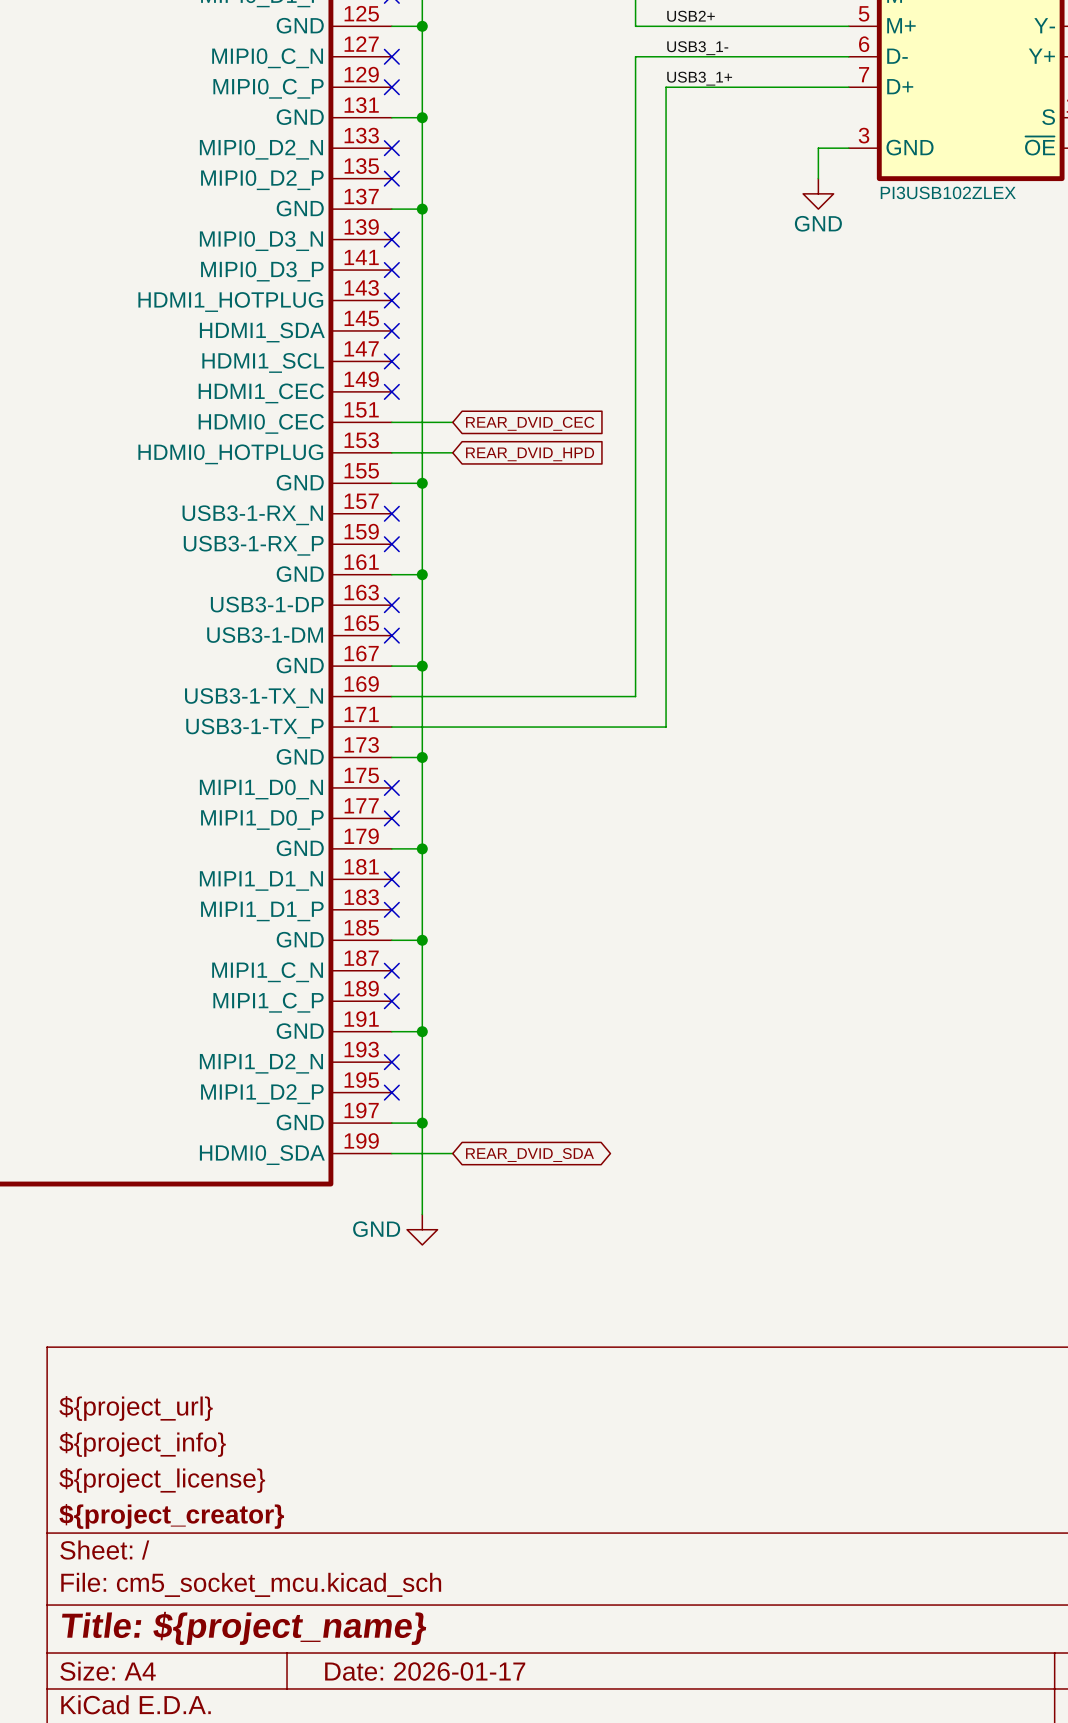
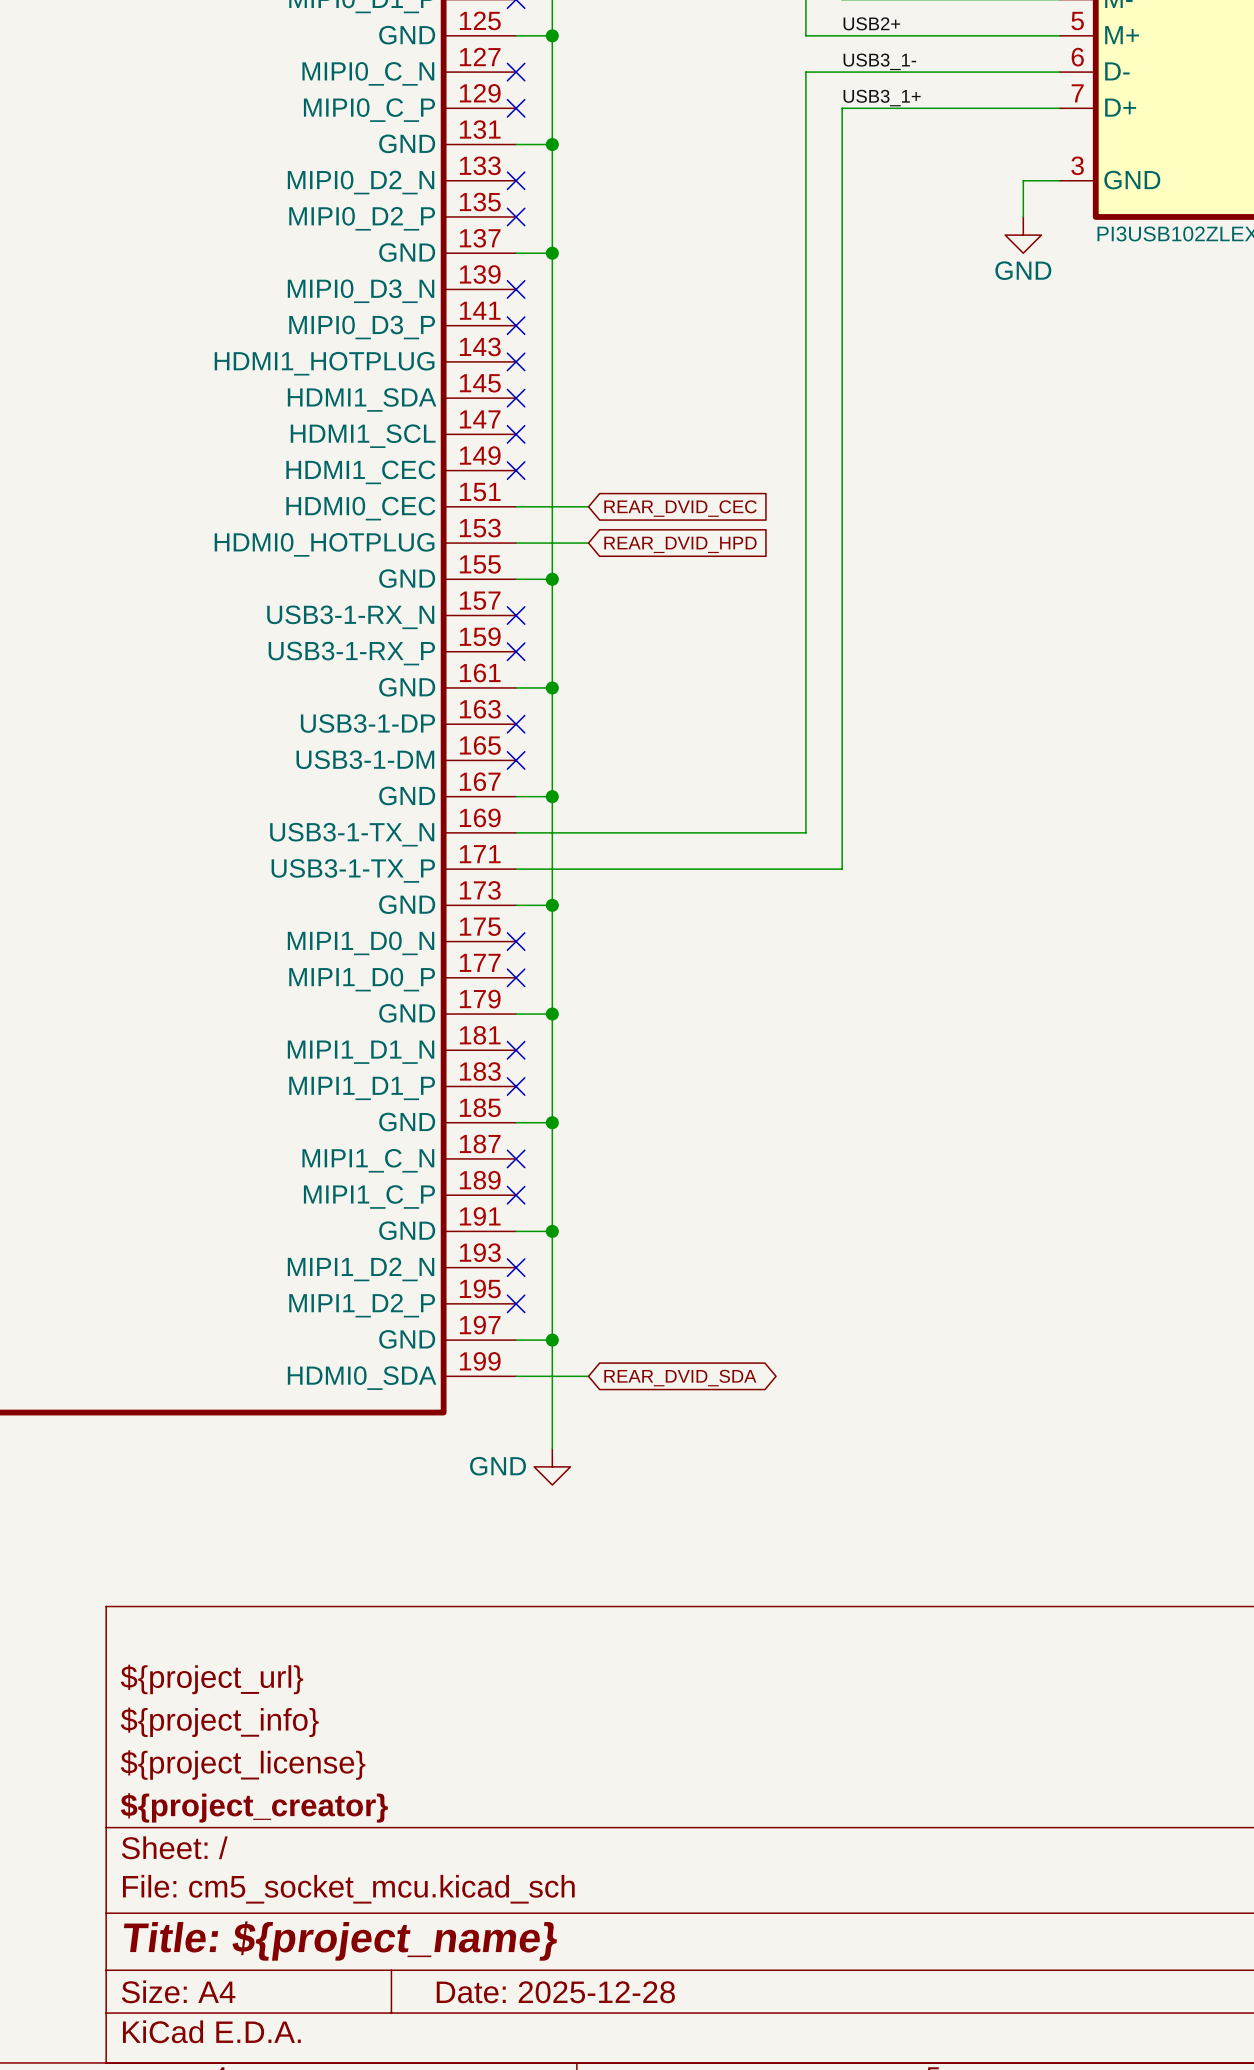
title block: Date: 2026-01-17 (425, 1671) -> Date: 2025-12-28 (555, 1992)

